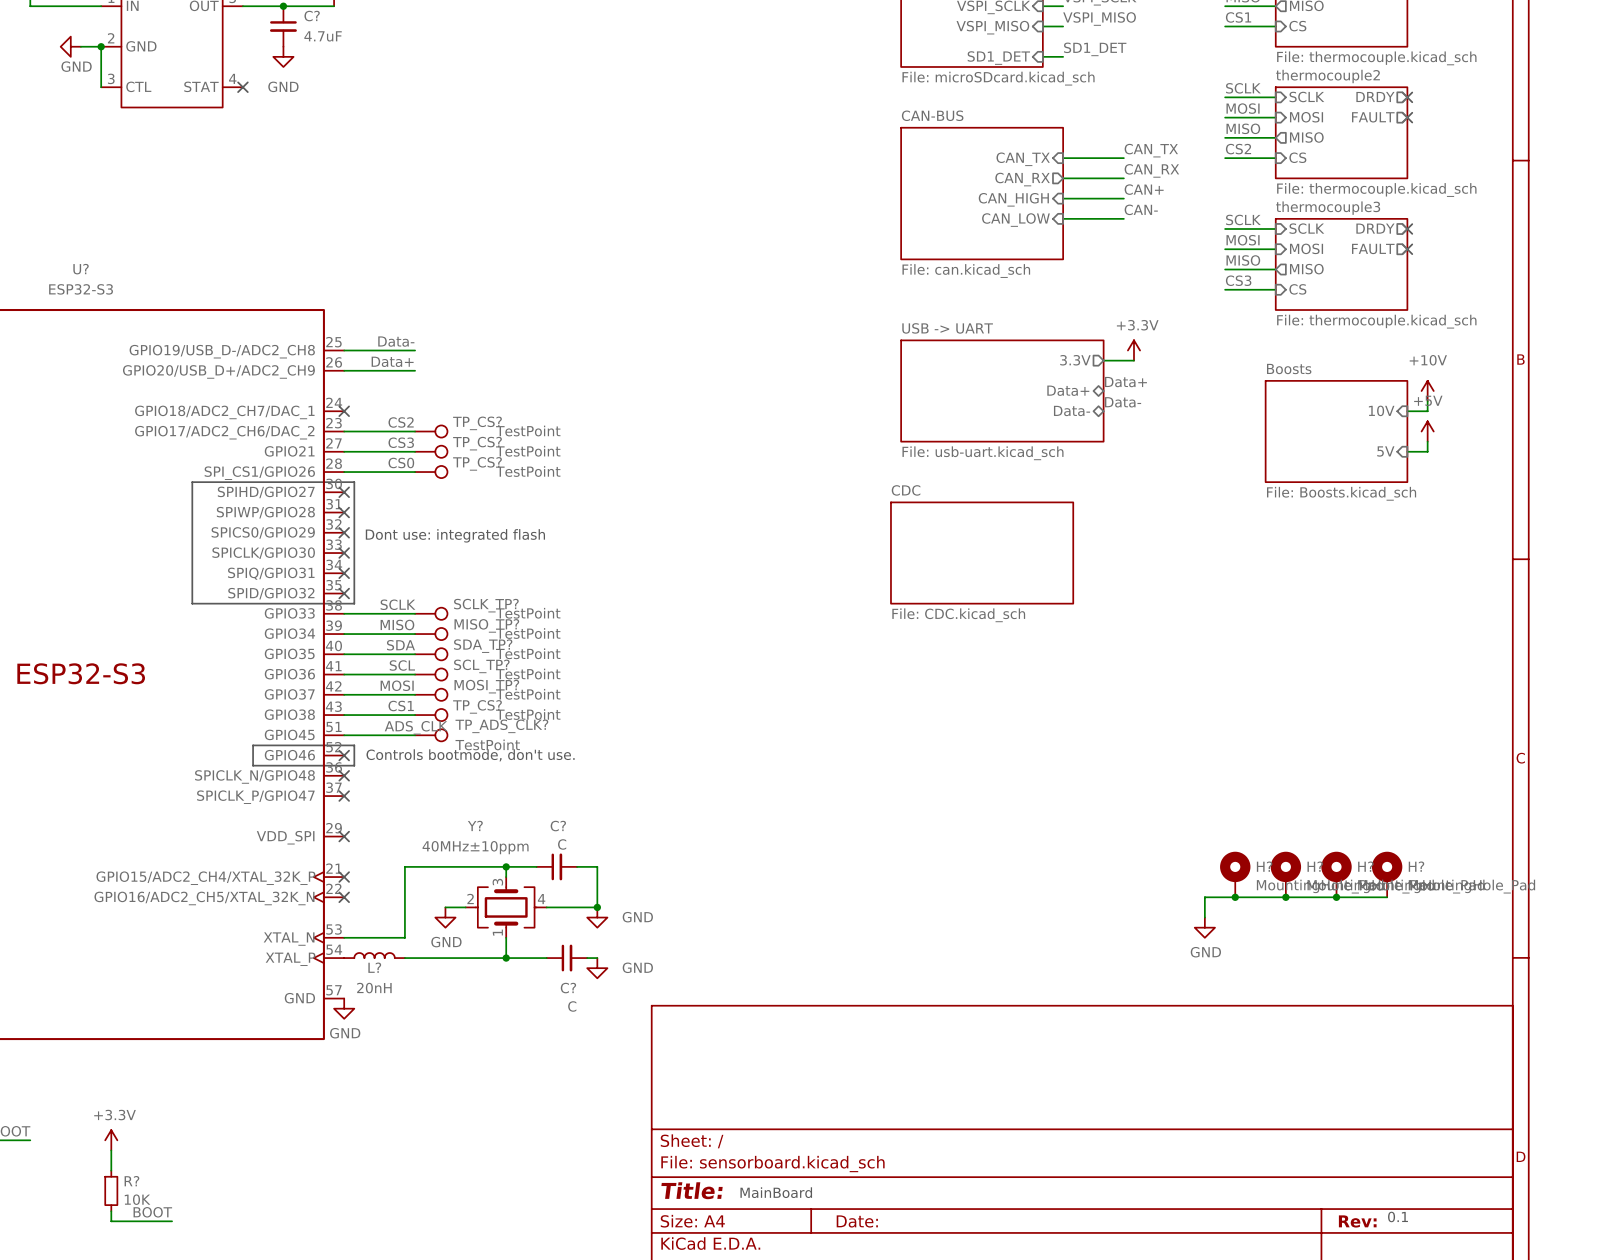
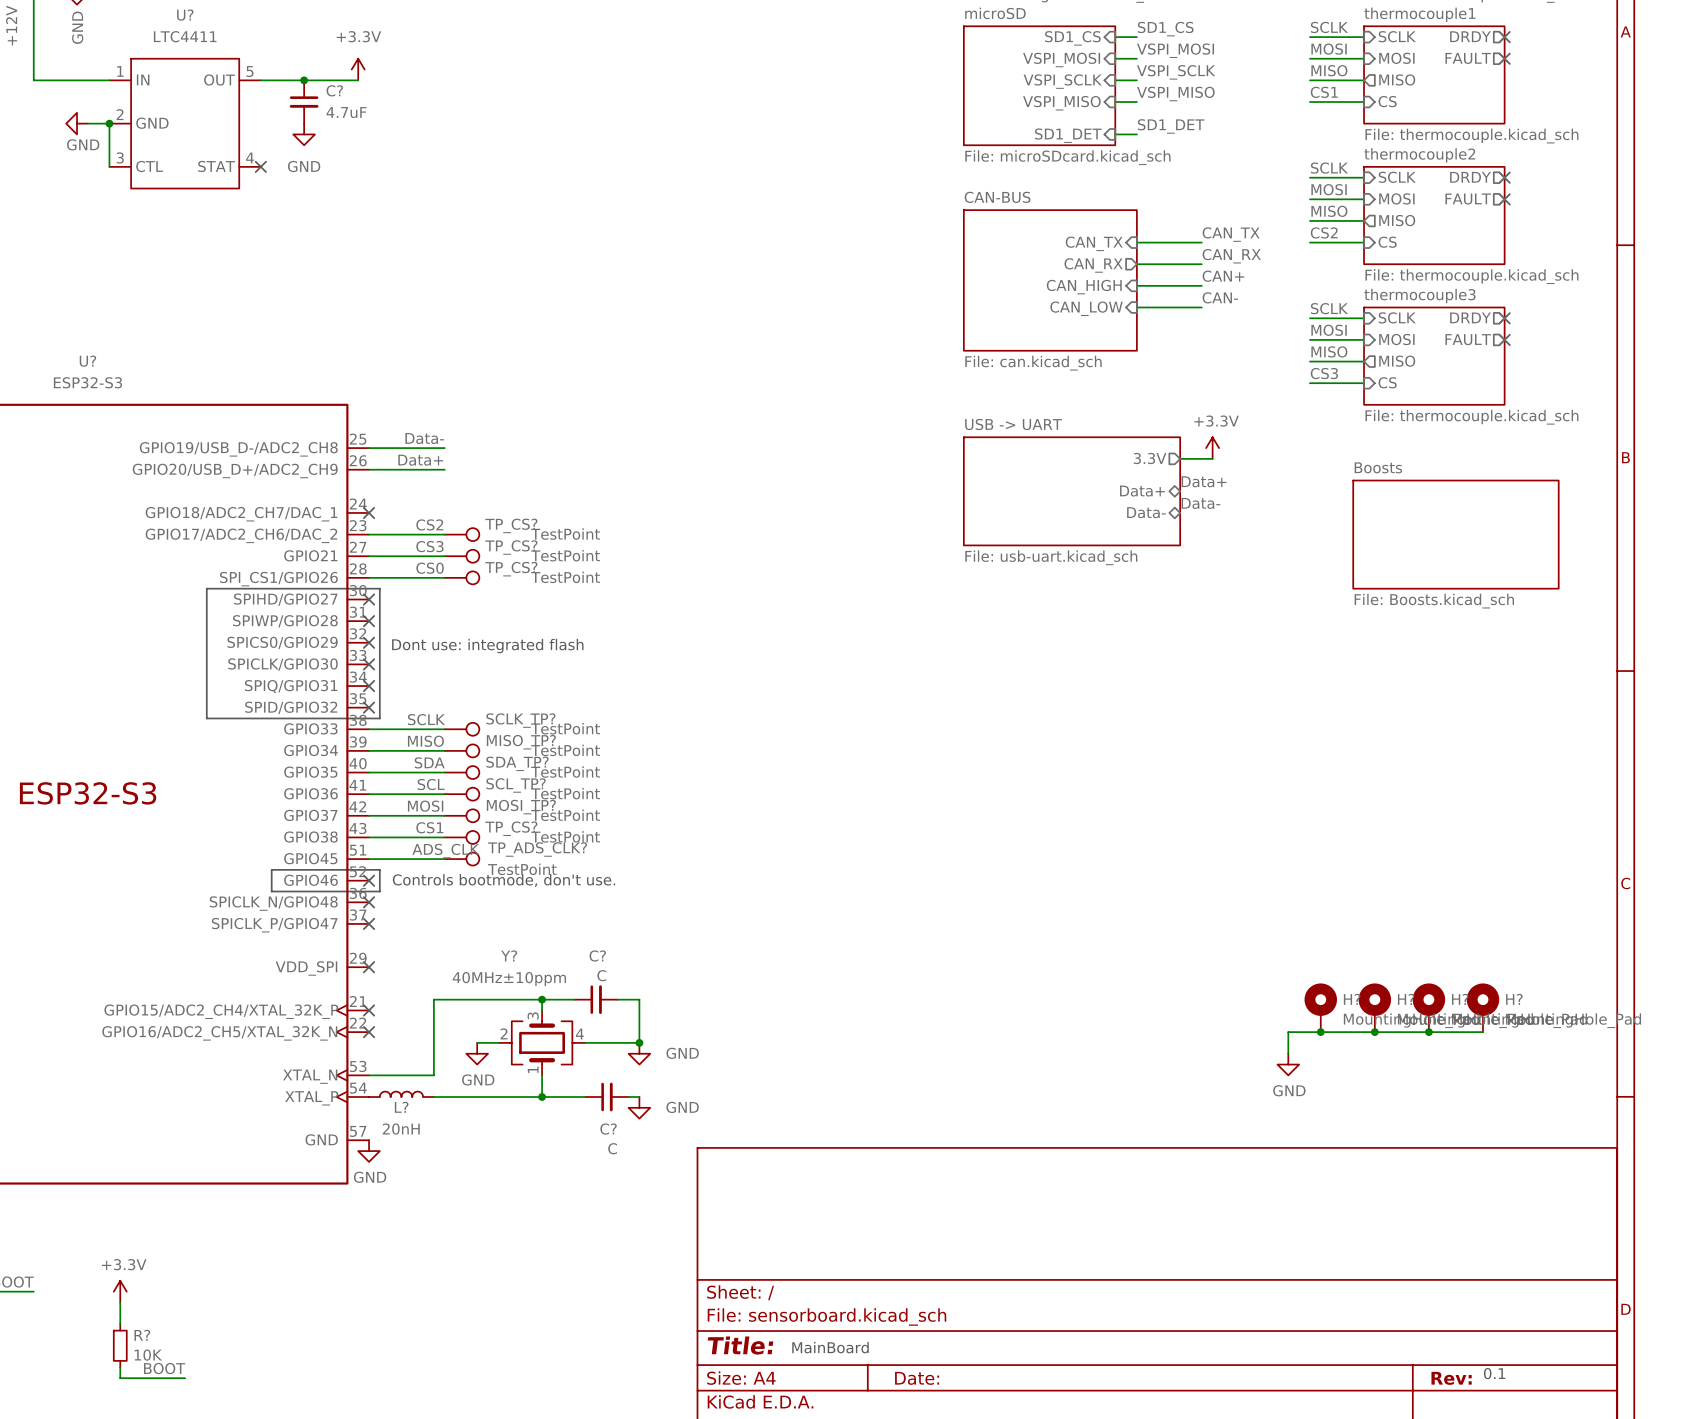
power symbol: +10V (1427, 391) -> none
wire: (1427, 401) (1427, 411) (1407, 411) -> none
sheet pin: 10V (1381, 410) -> none
sheet Boosts: File: Boosts.kicad_sch (1336, 431) -> none
sheet Boosts: none -> File: Boosts.kicad_sch (1455, 534)
power symbol: +5V (1427, 431) -> none
wire: (1427, 441) (1427, 451) (1407, 451) -> none
sheet pin: 5V (1385, 451) -> none
sheet CDC: File: CDC.kicad_sch (982, 553) -> none

